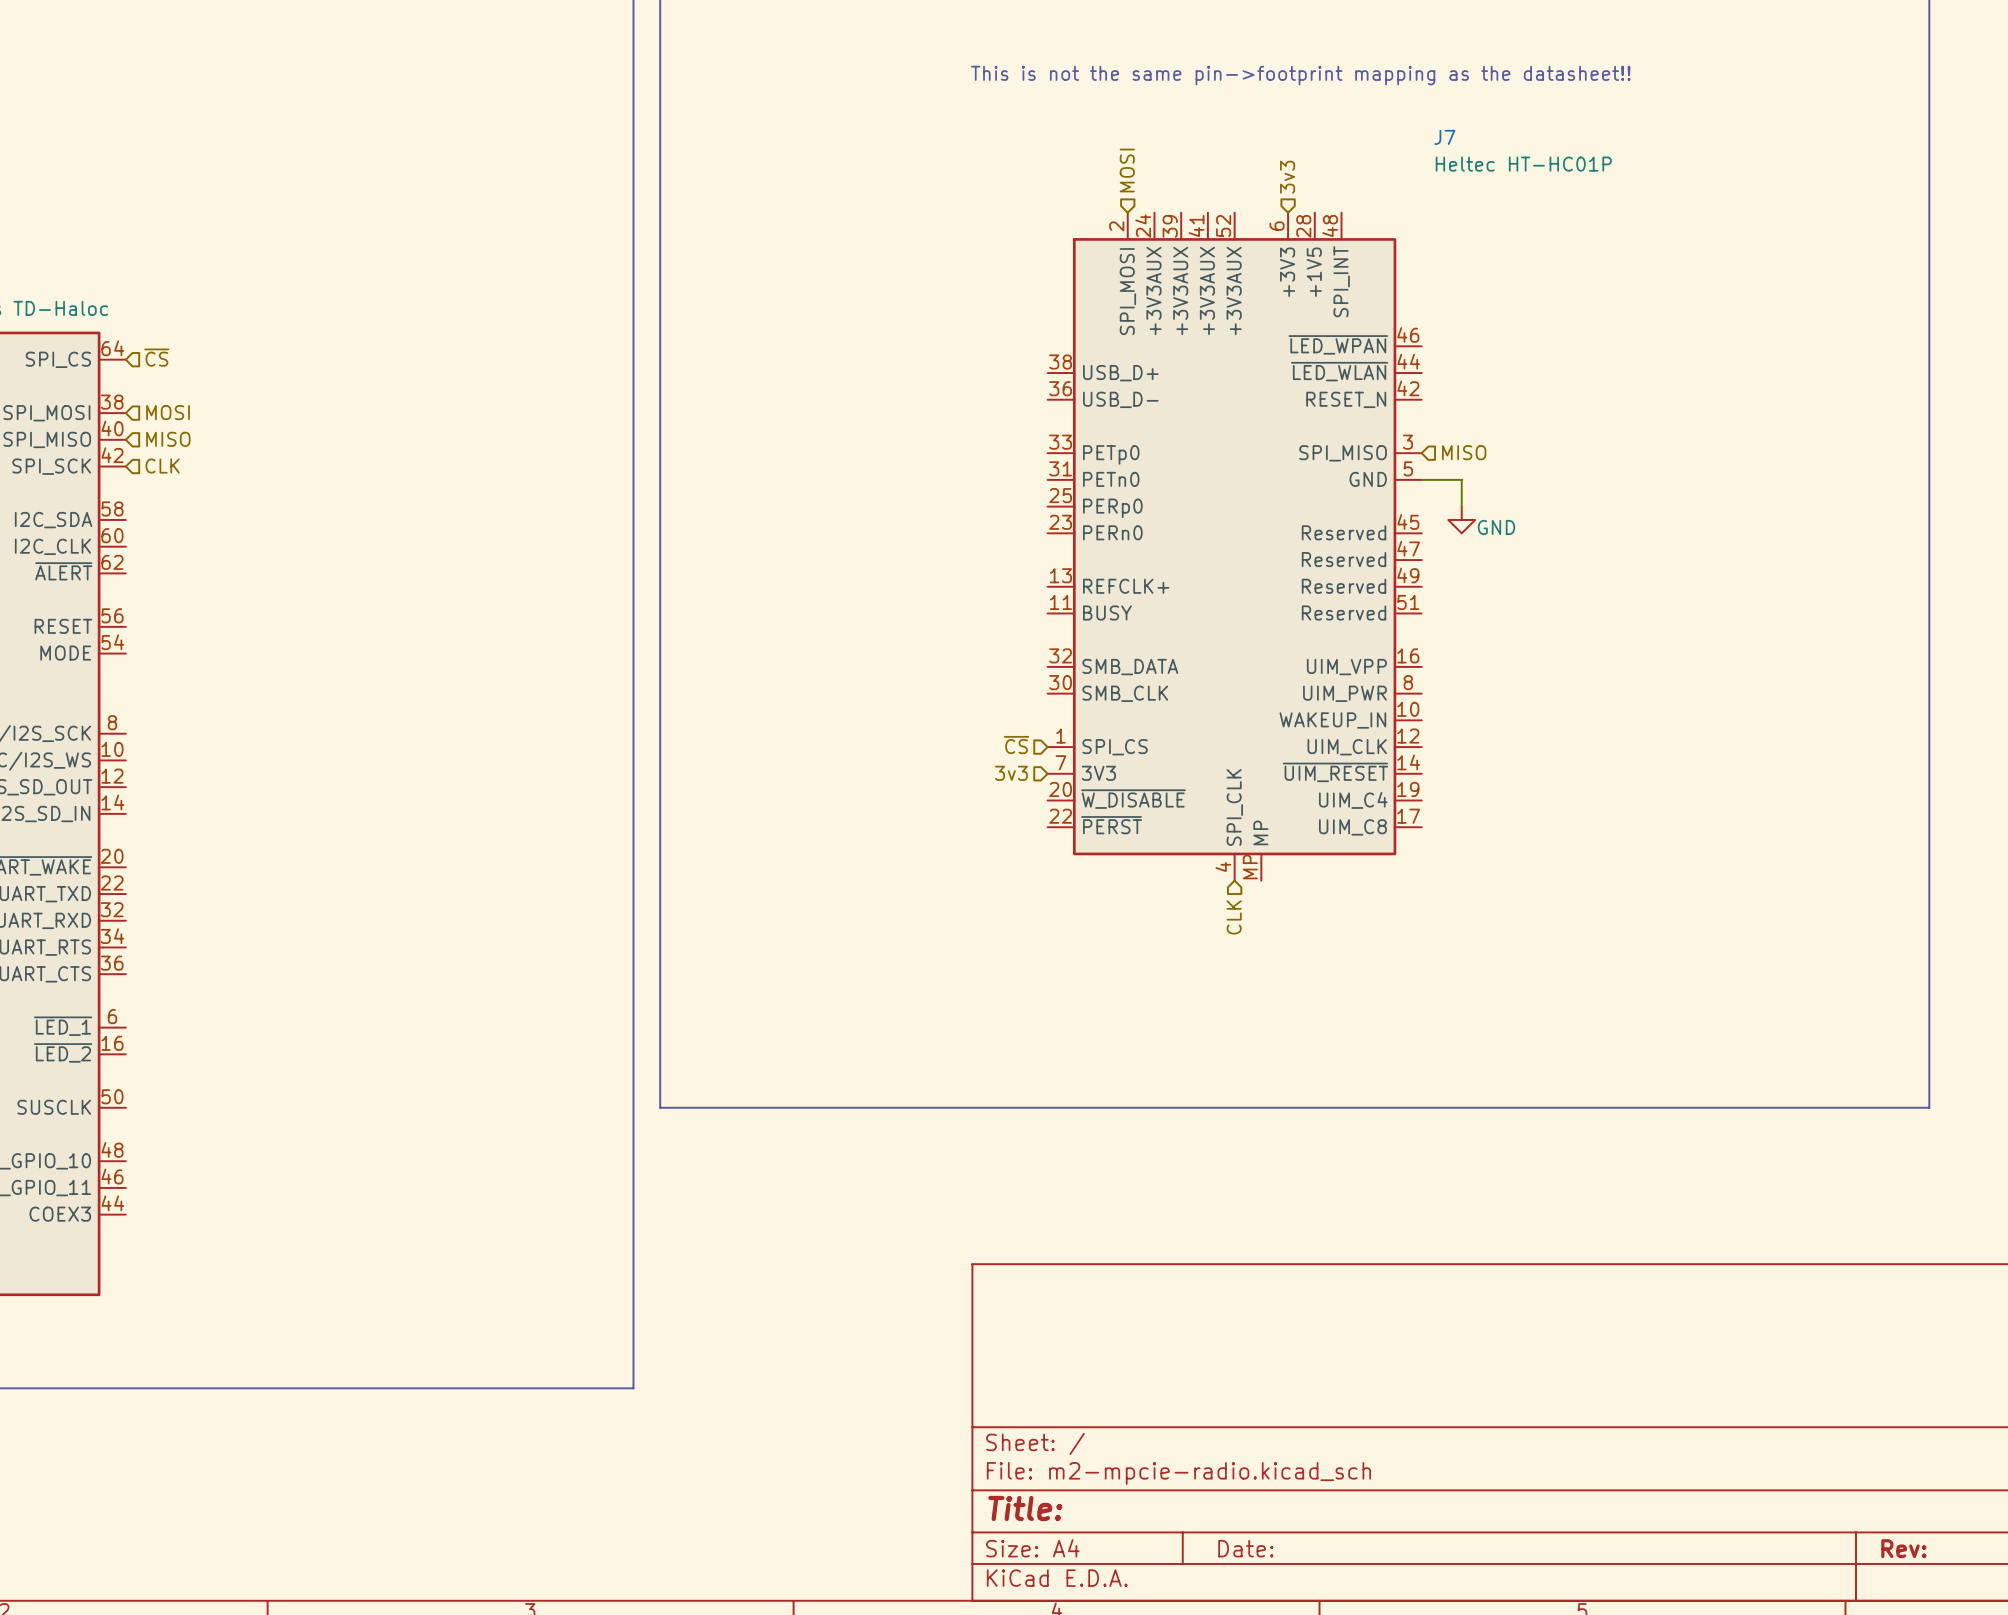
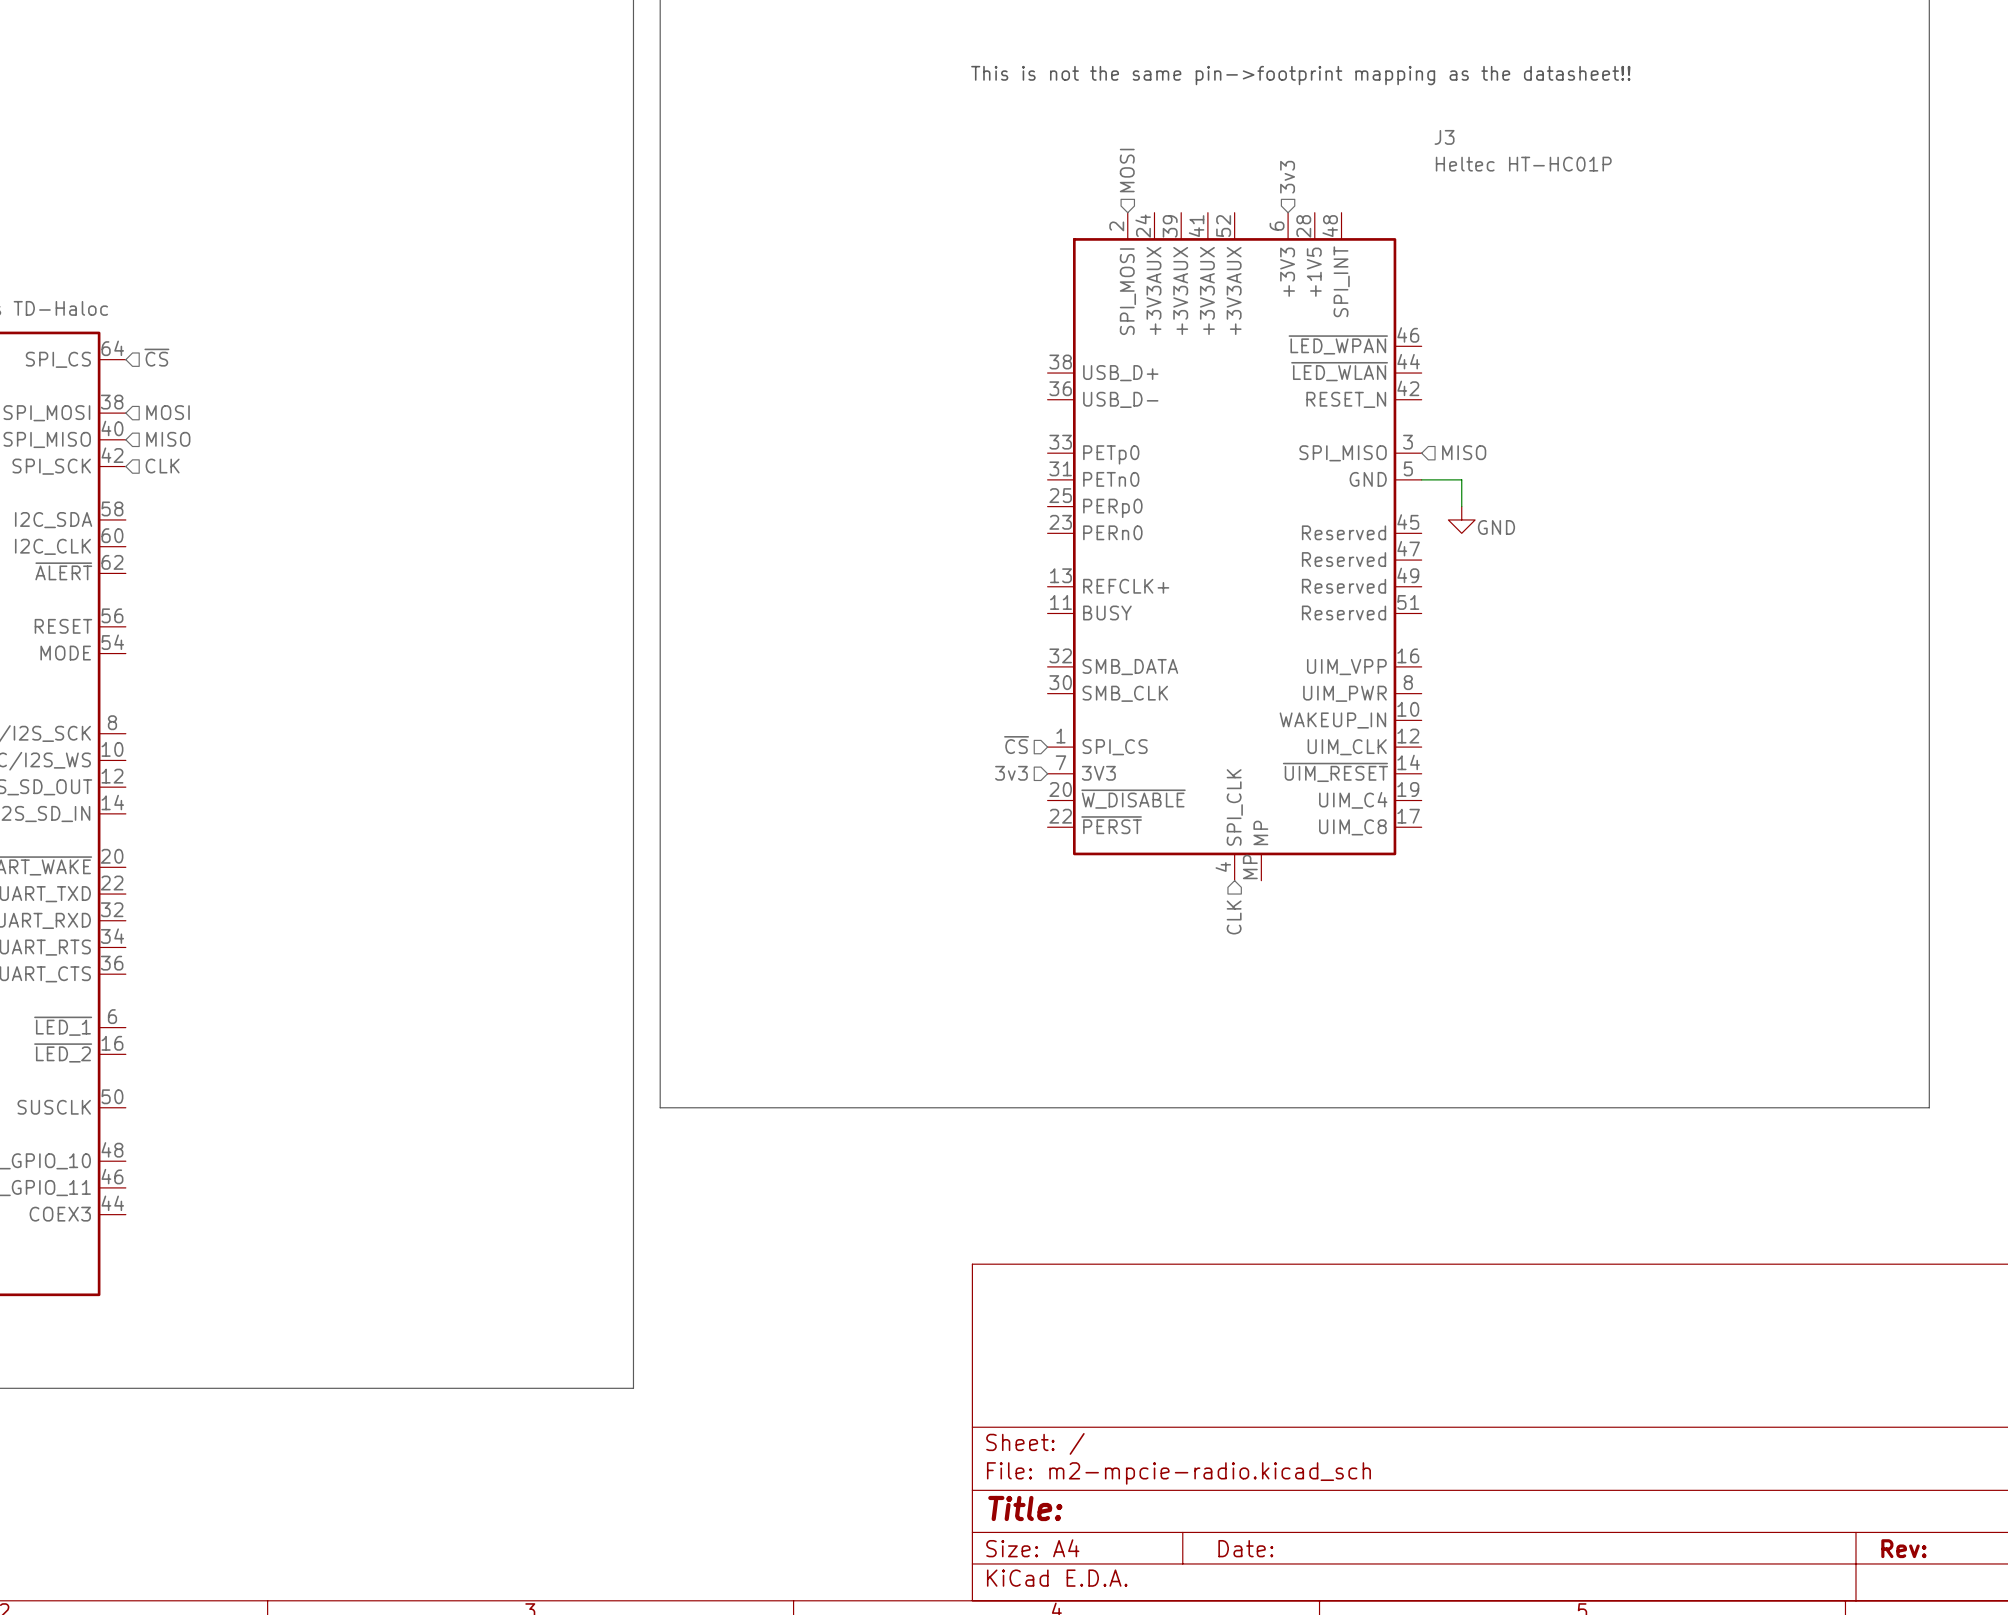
J7 name: J7 (1444, 137) -> J3 (1444, 137)

